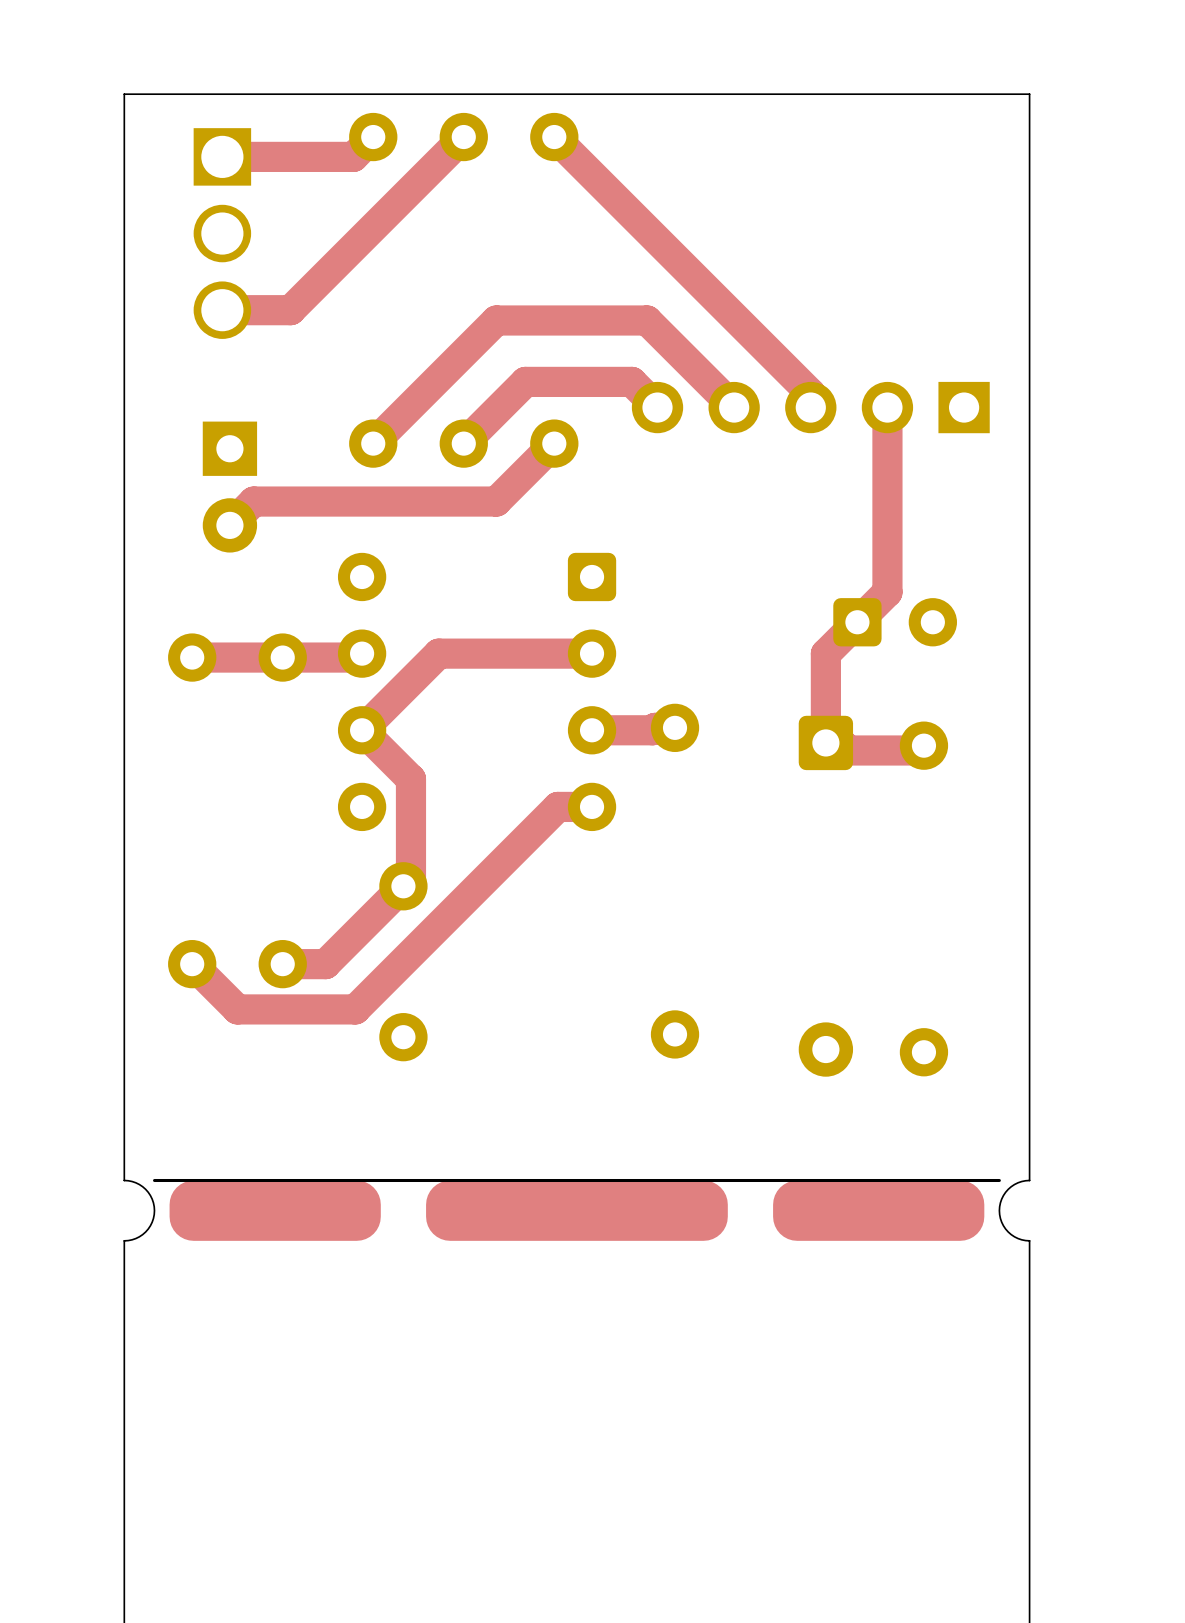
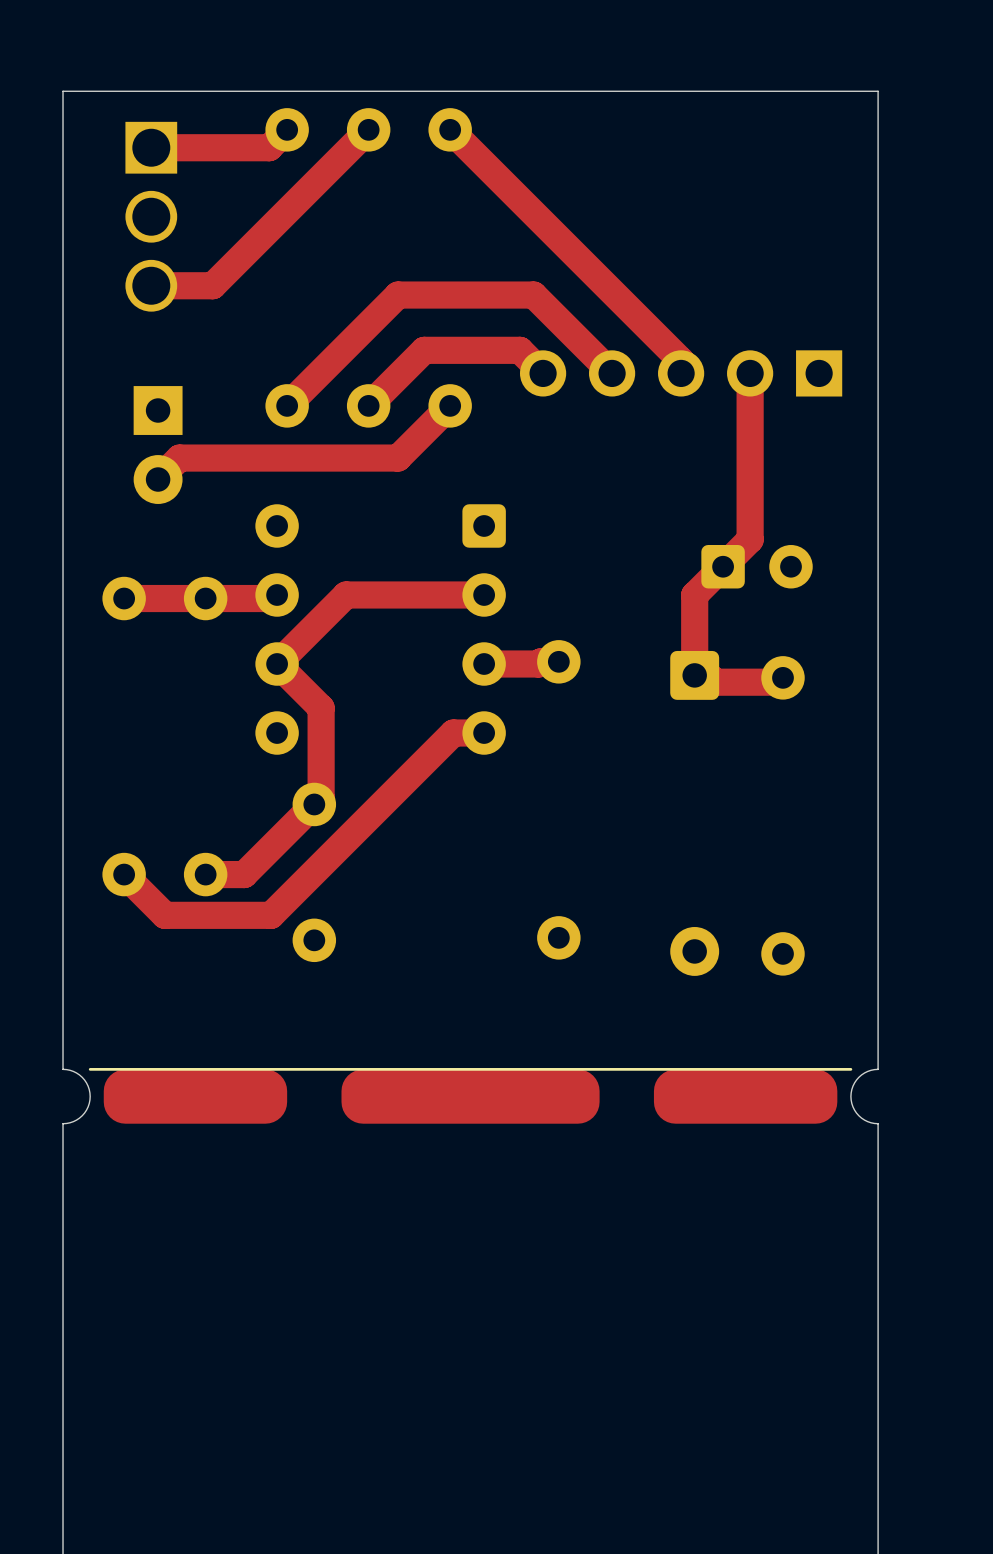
part footprint: [152, 1178, 1001, 1241] -> [88, 1068, 853, 1124]

